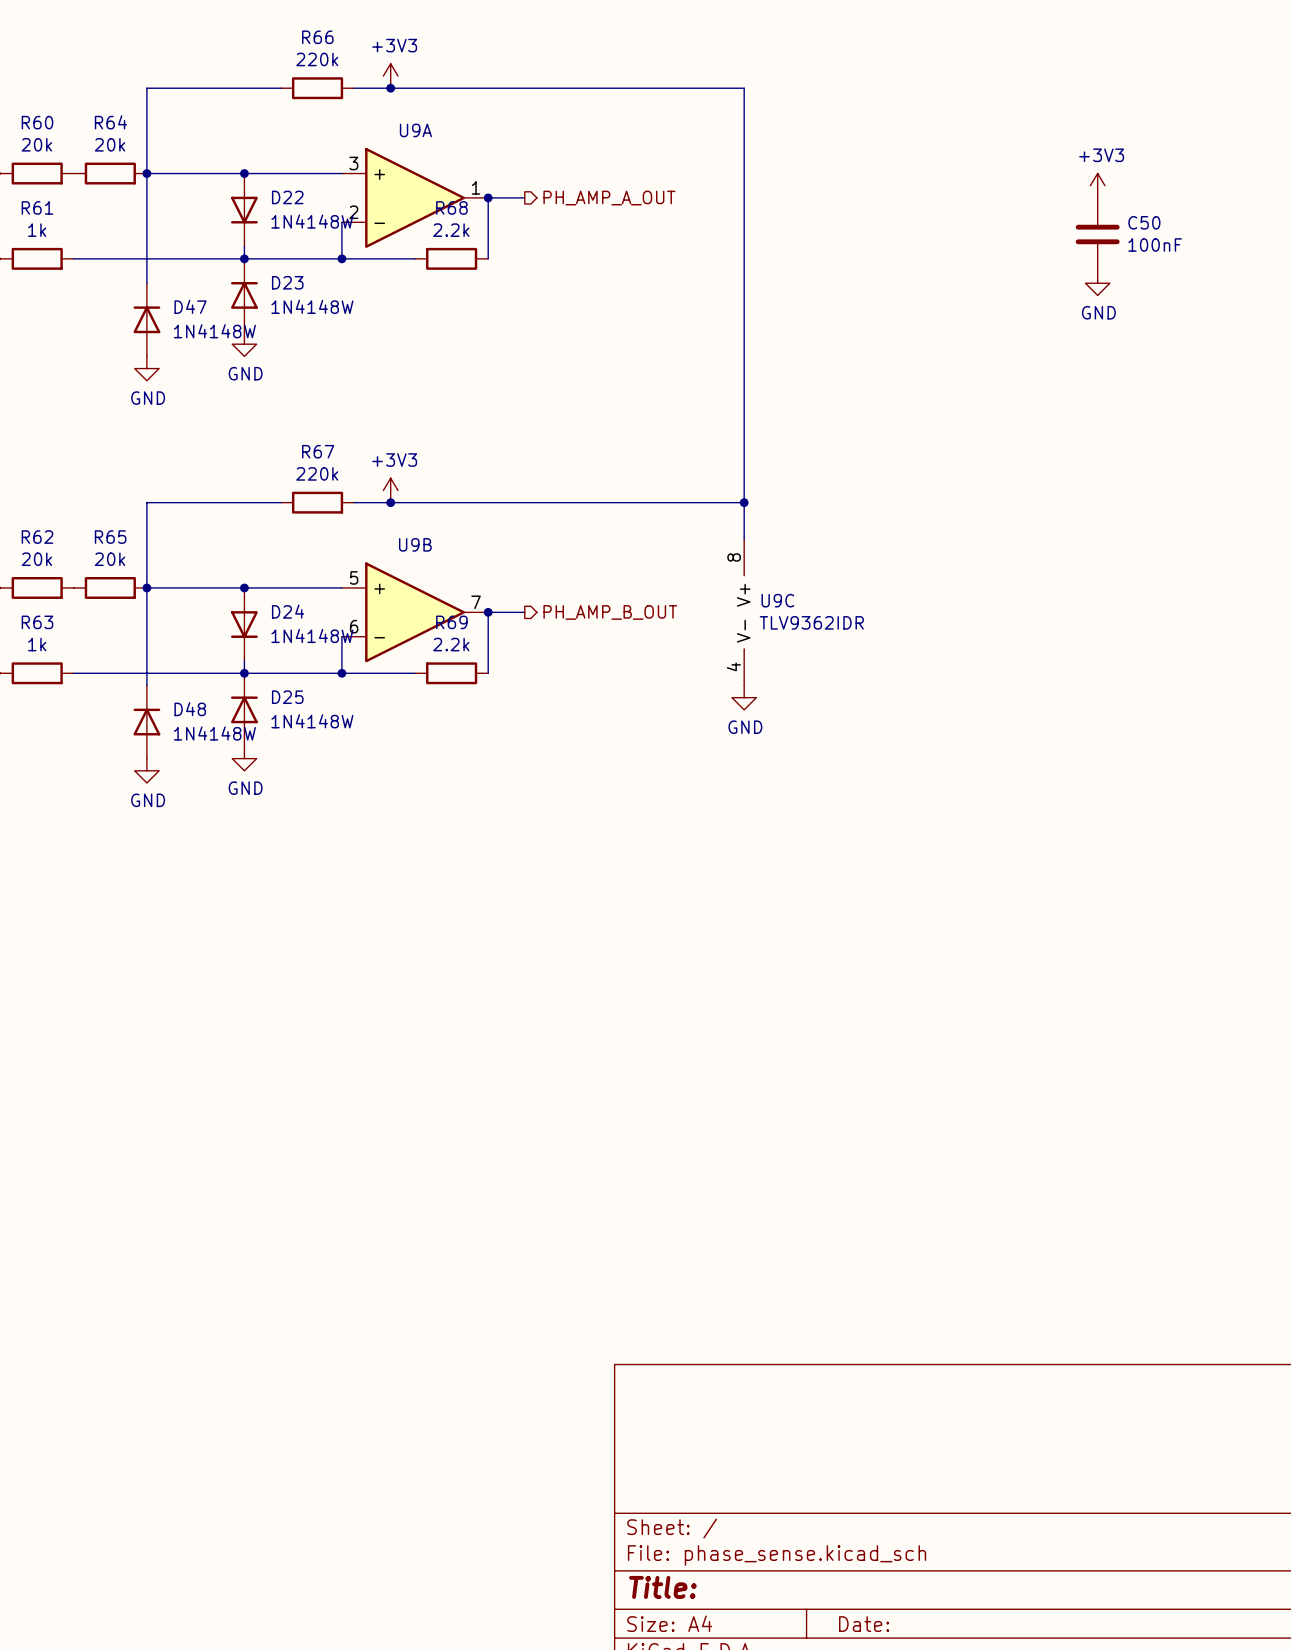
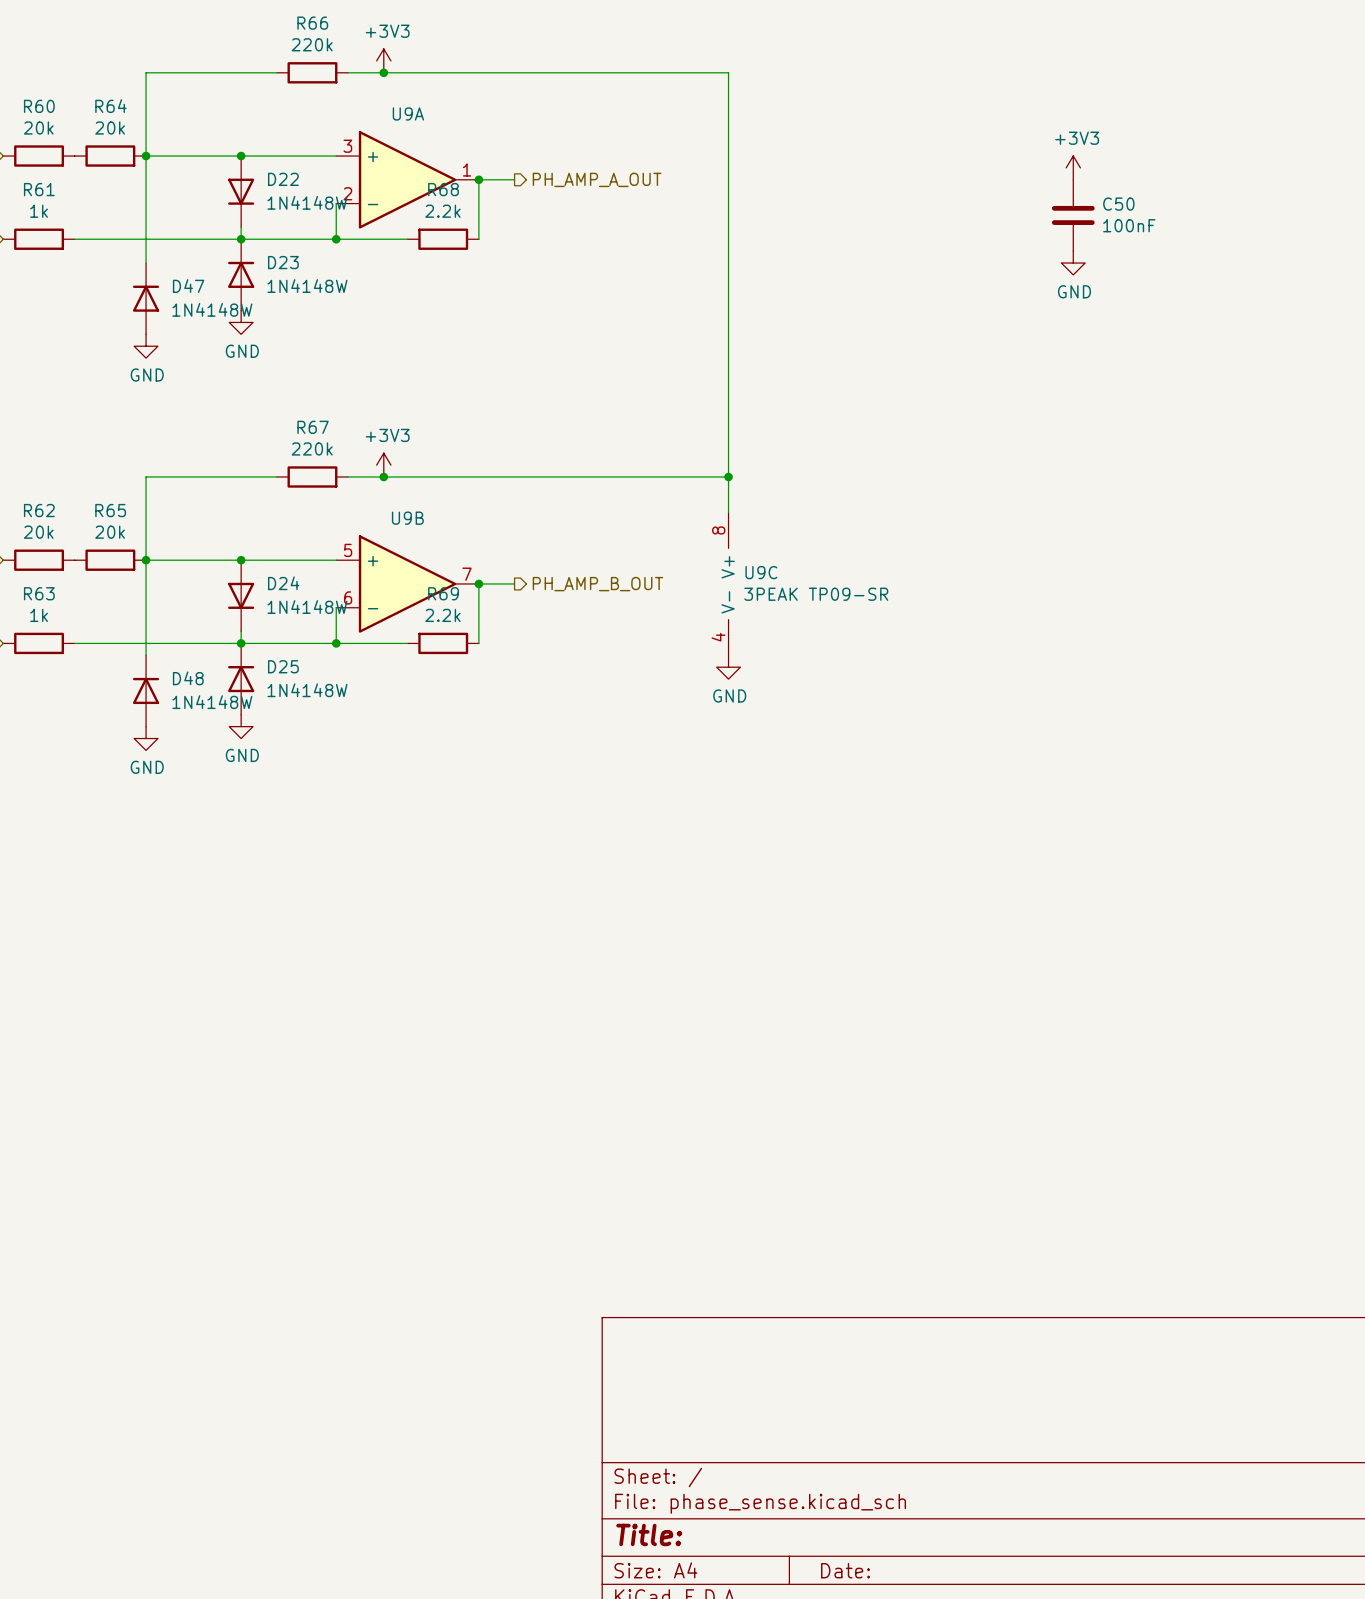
U9C value: TLV9362IDR (811, 622) -> 3PEAK TP09-SR (816, 594)

